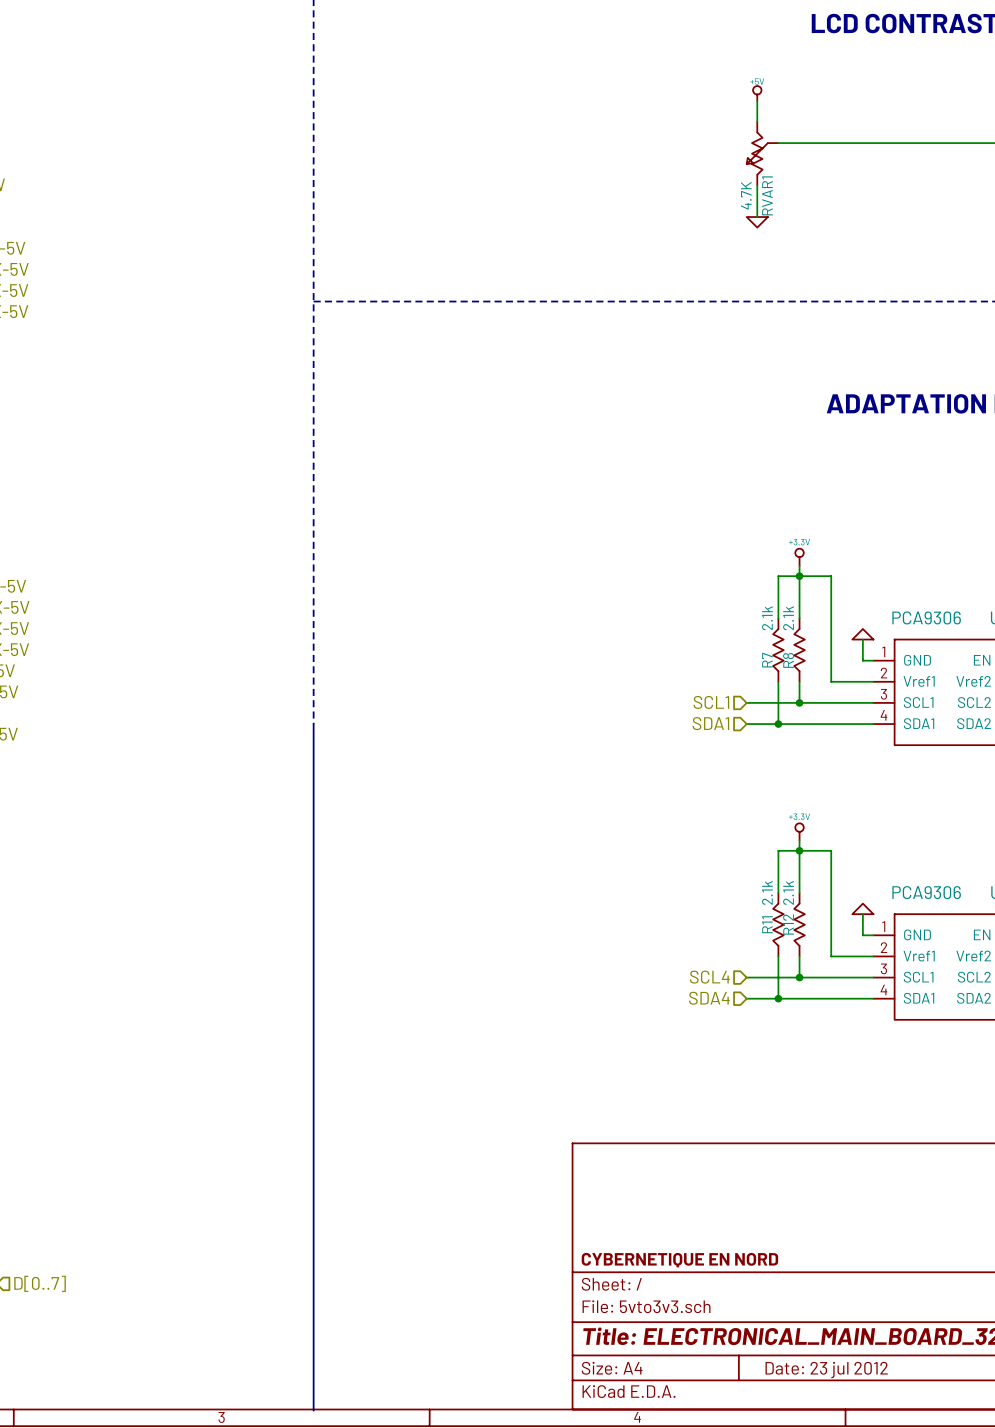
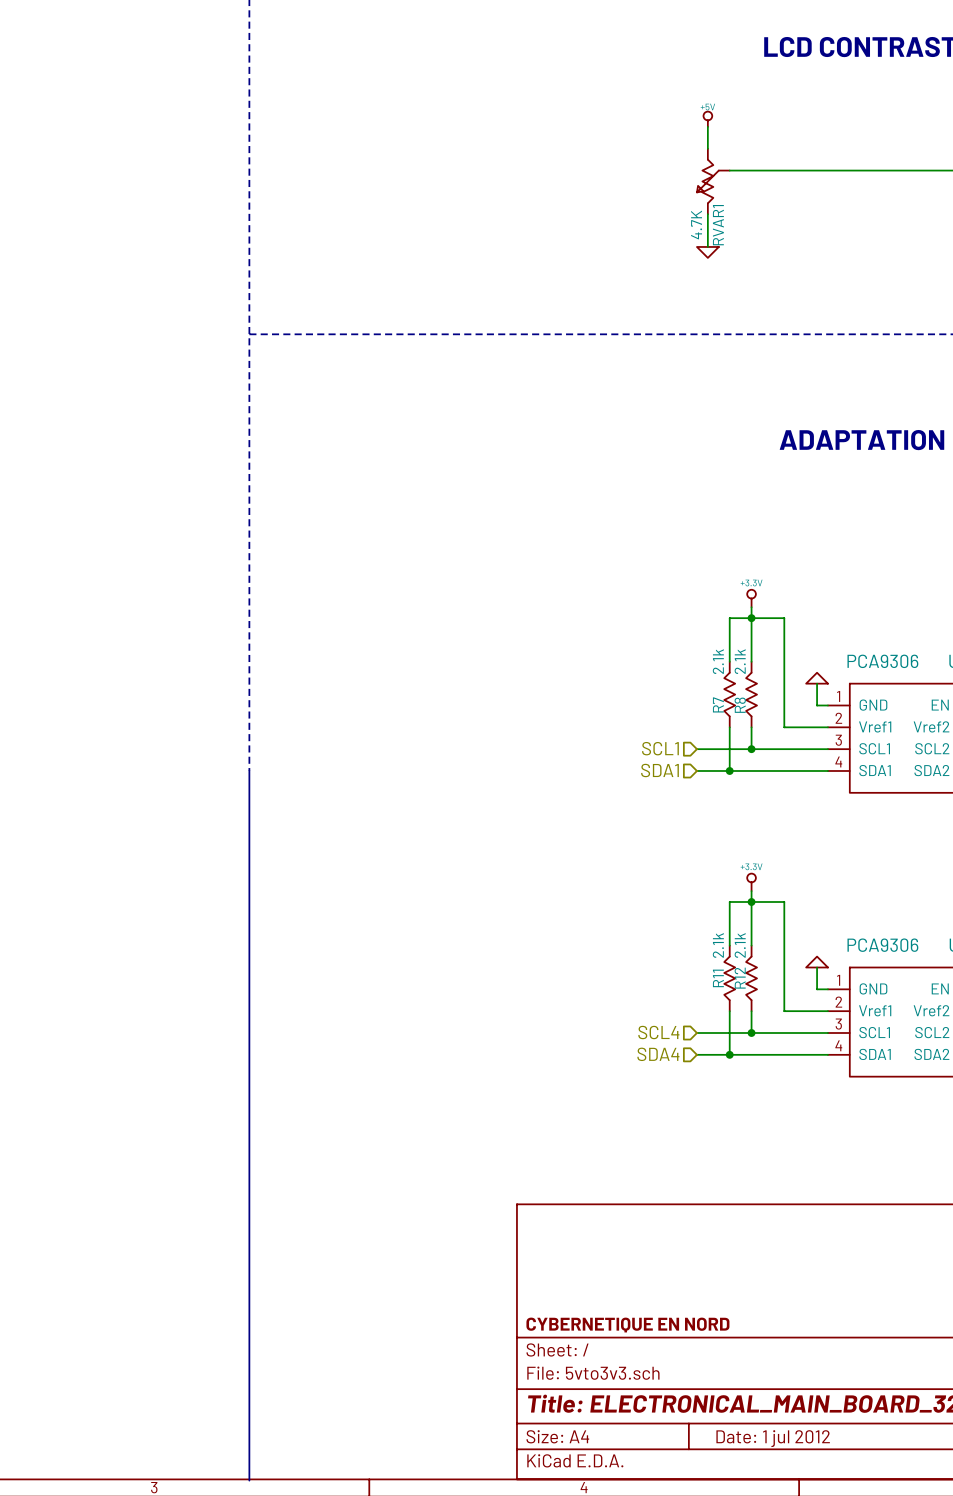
title block: Date: 23 jul 2012 (826, 1370) -> Date: 1 jul 2012 (773, 1438)

